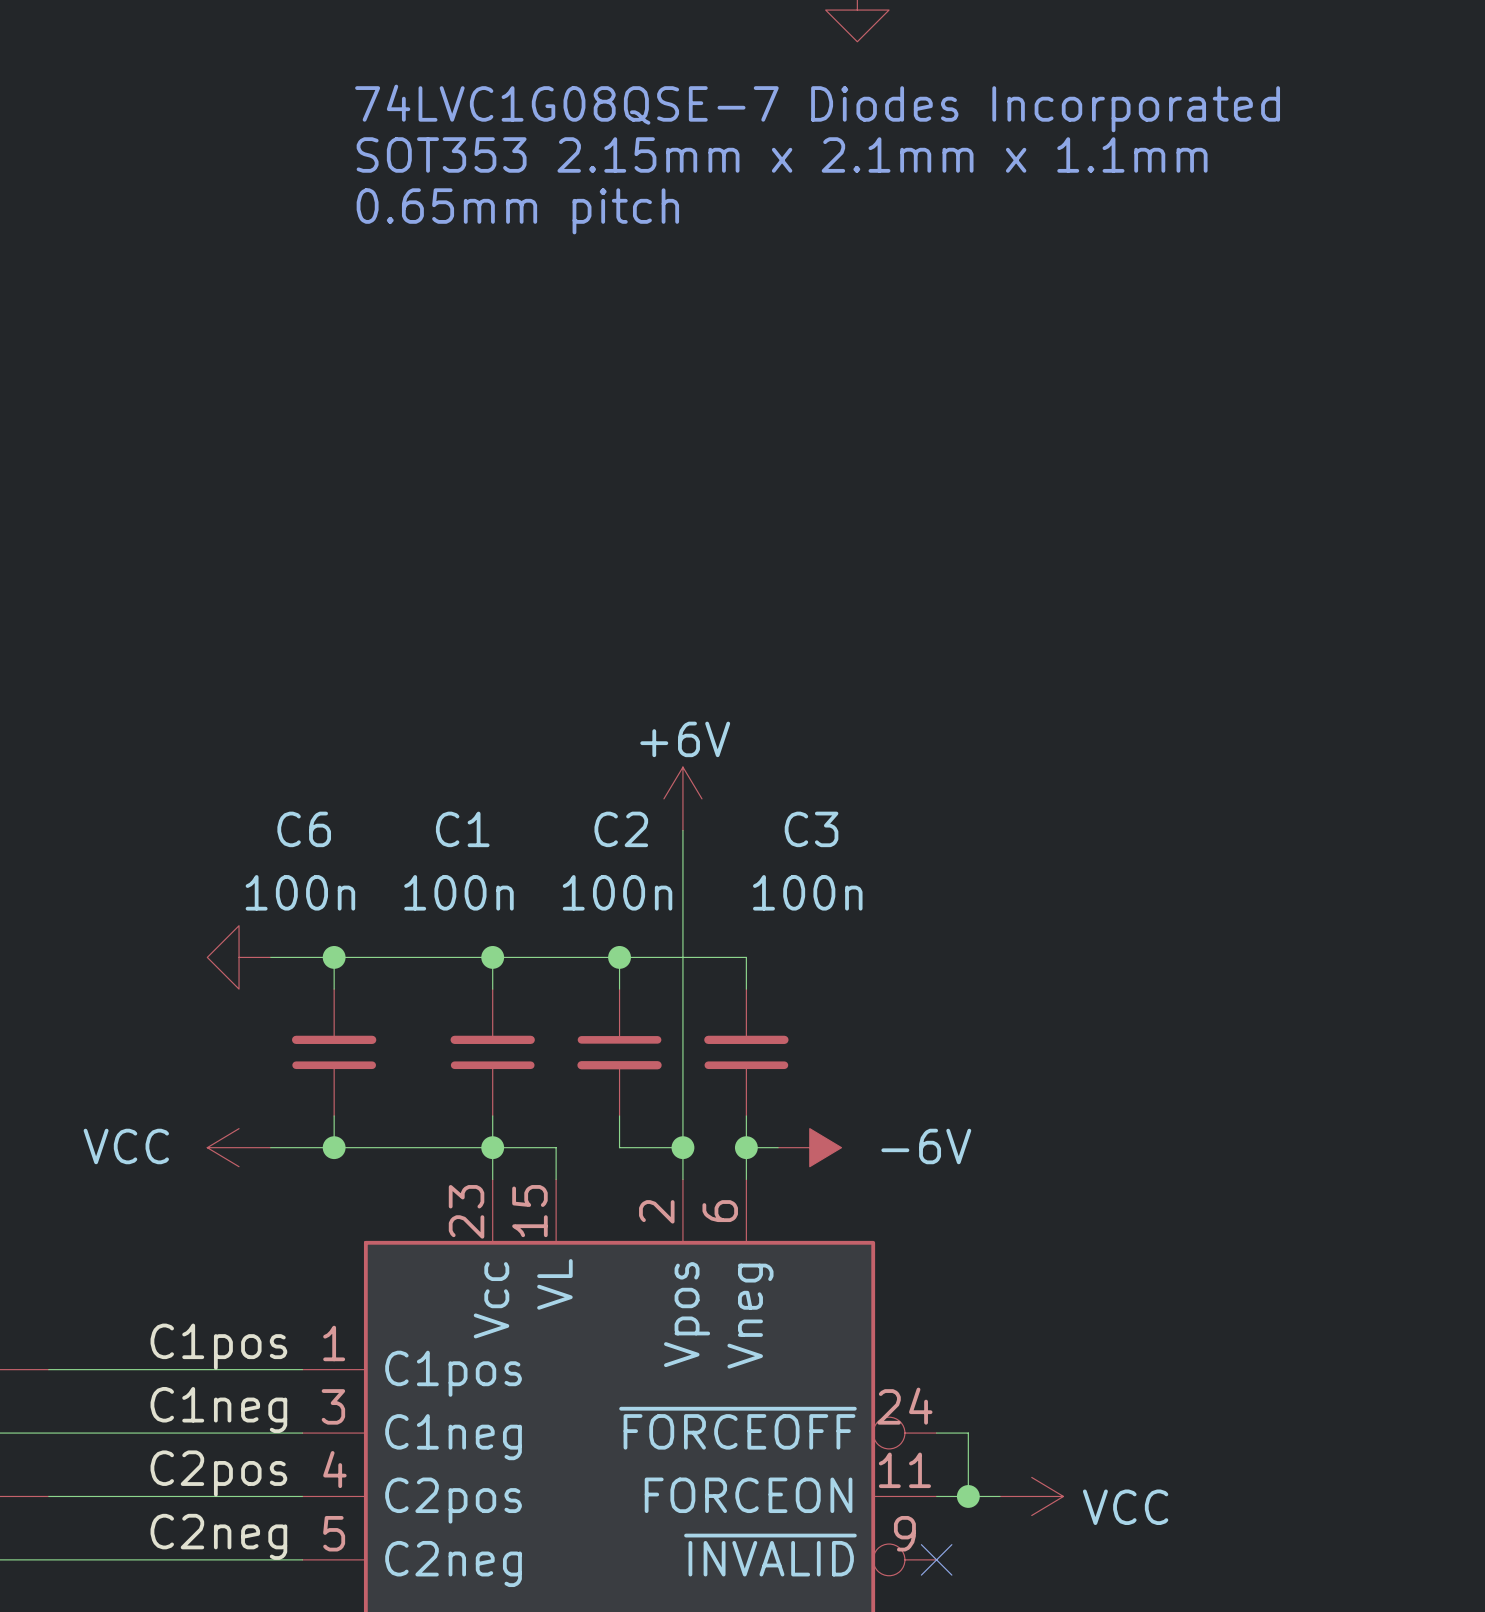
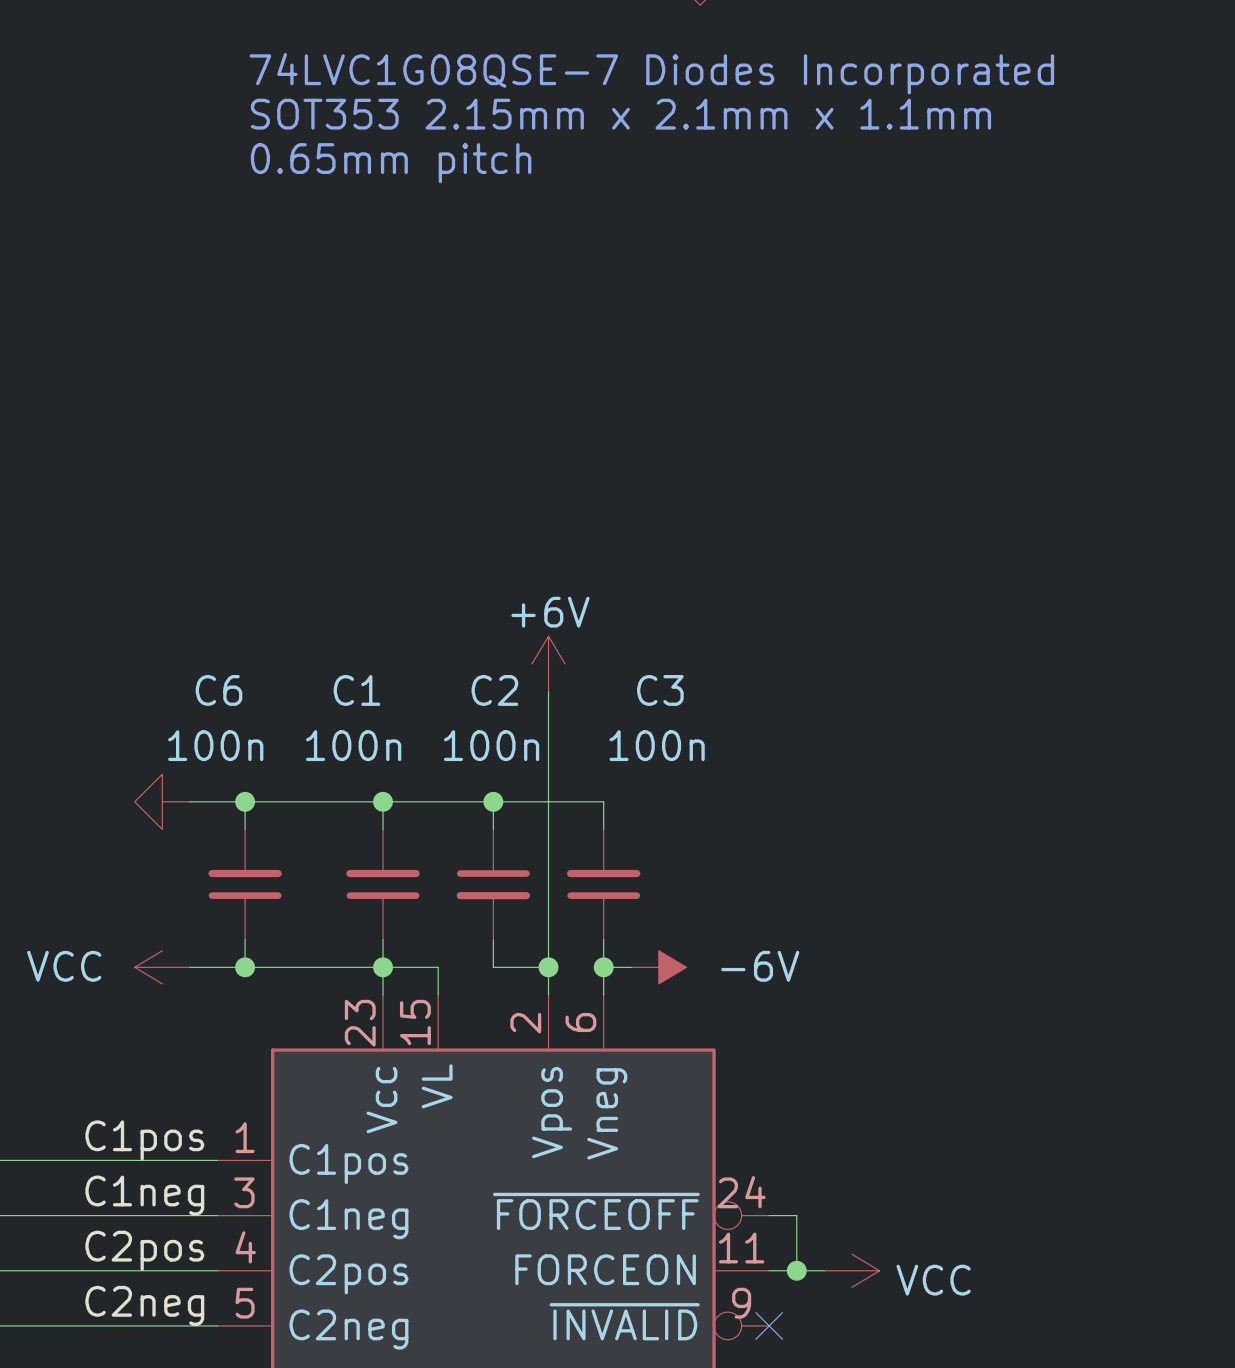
text position: 74LVC1G08QSE-7 Diodes Incorporated (817, 108) -> 74LVC1G08QSE-7 Diodes Incorporated (651, 73)
text position: SOT353 2.15mm x 2.1mm x 1.1mm (782, 154) -> SOT353 2.15mm x 2.1mm x 1.1mm (620, 114)
text position: 0.65mm pitch (517, 211) -> 0.65mm pitch (391, 163)

